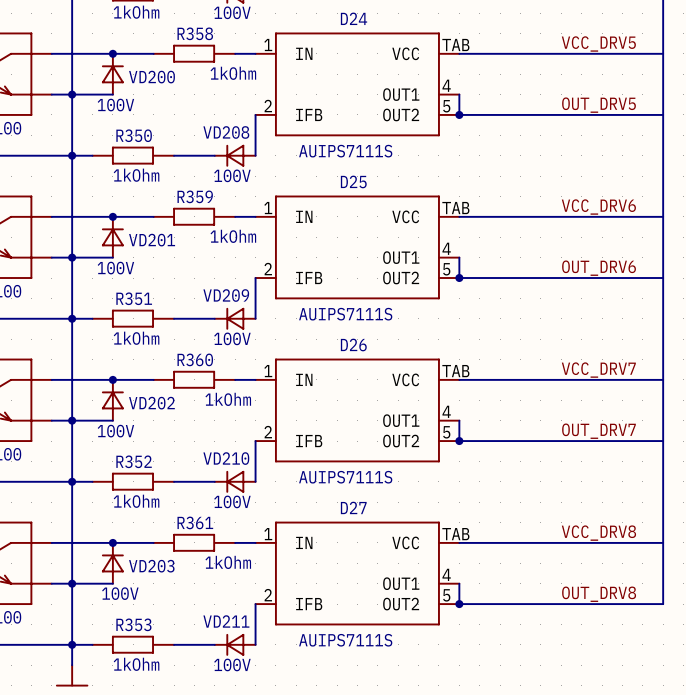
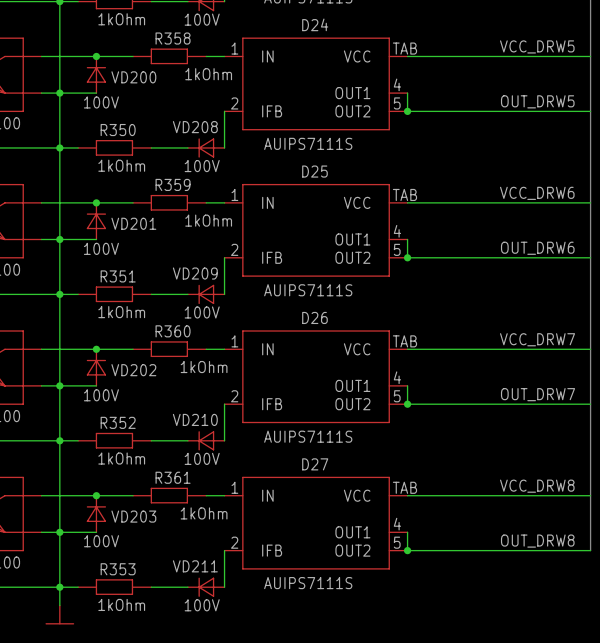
label: VCC_DRV5 (598, 43) -> VCC_DRW5 (537, 46)
label: OUT_DRV5 (599, 105) -> OUT_DRW5 (537, 101)
label: VCC_DRV6 (598, 207) -> VCC_DRW6 (537, 193)
label: OUT_DRV6 (599, 268) -> OUT_DRW6 (537, 248)
label: VCC_DRV7 (598, 370) -> VCC_DRW7 (537, 339)
label: OUT_DRV7 (598, 431) -> OUT_DRW7 (537, 394)
label: VCC_DRV8 (598, 533) -> VCC_DRW8 (537, 486)
label: OUT_DRV8 (599, 594) -> OUT_DRW8 (537, 541)

